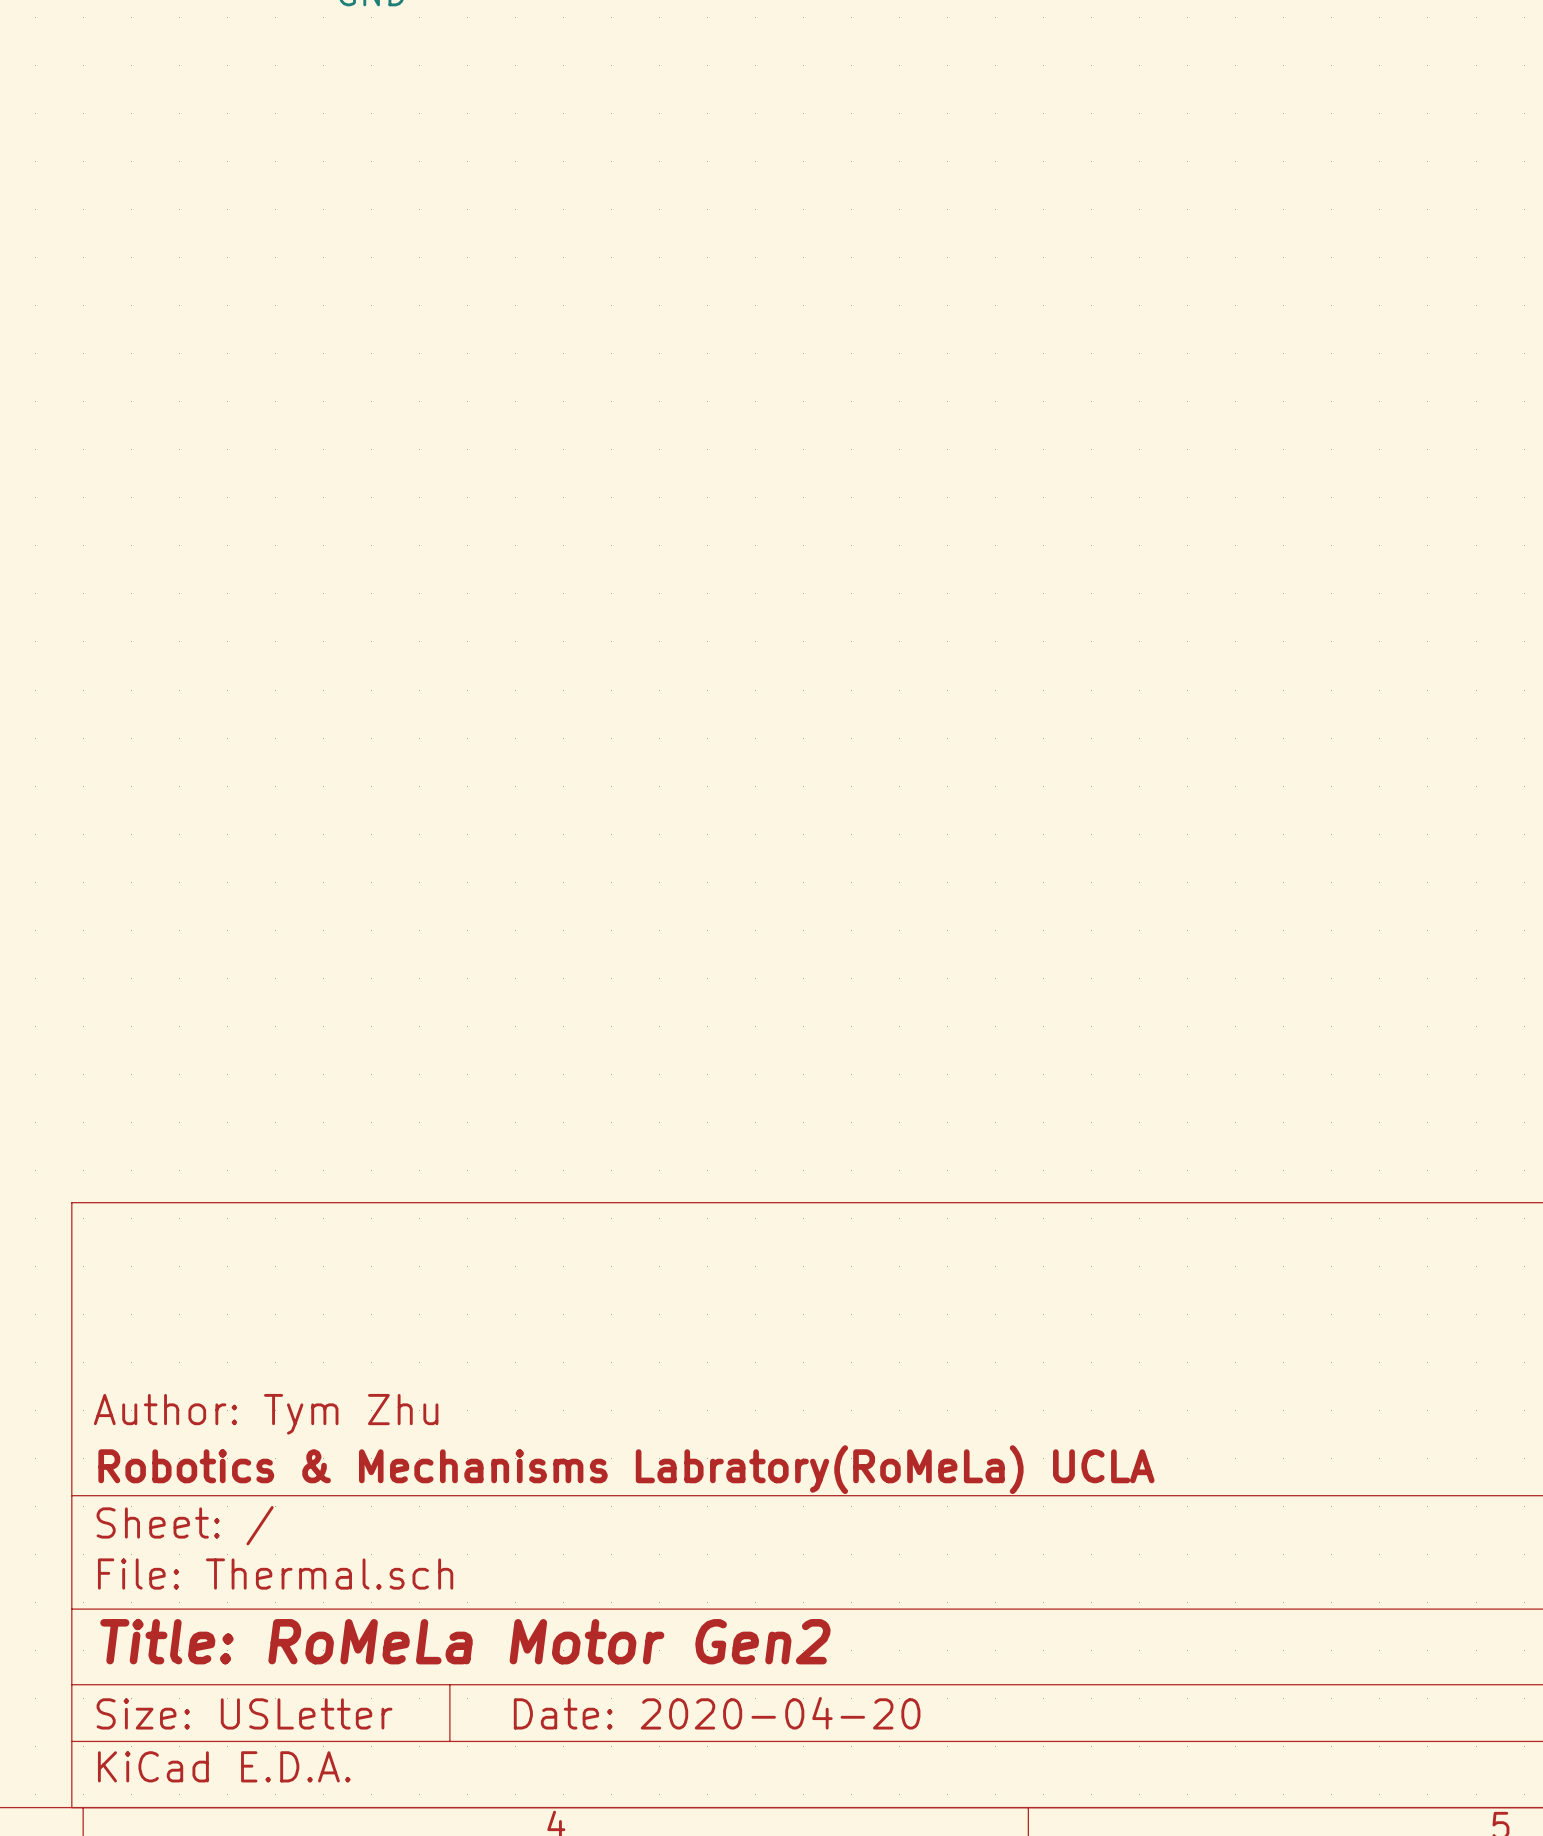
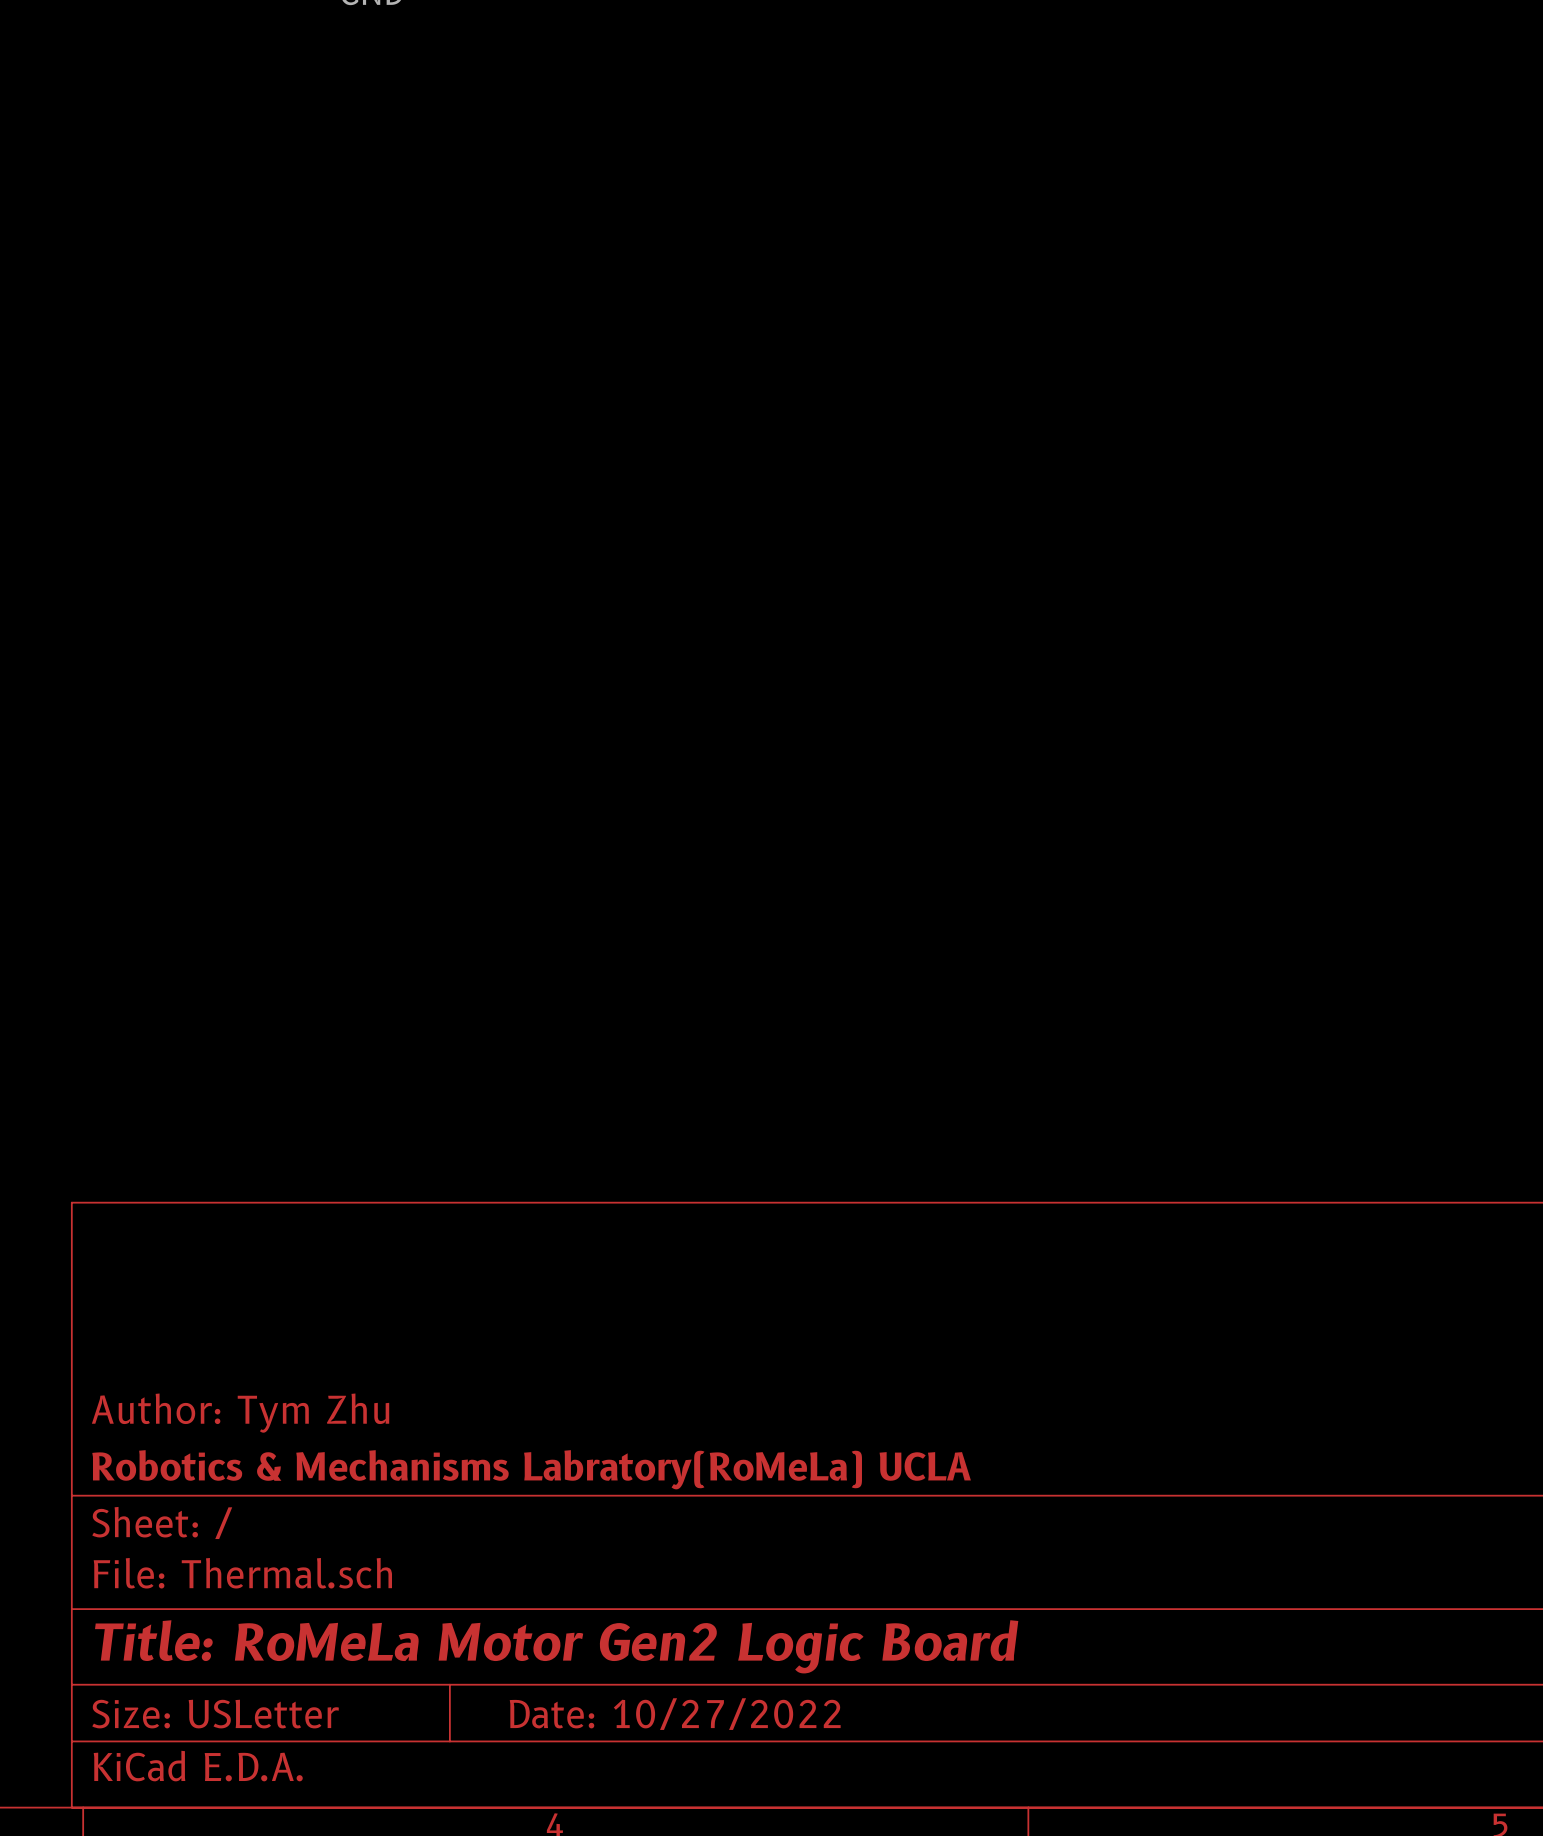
title block: Title: RoMeLa Motor Gen2 (465, 1641) -> Title: RoMeLa Motor Gen2 Logic Board (556, 1646)
title block: Date: 2020-04-20 (717, 1713) -> Date: 10/27/2022 (675, 1714)

